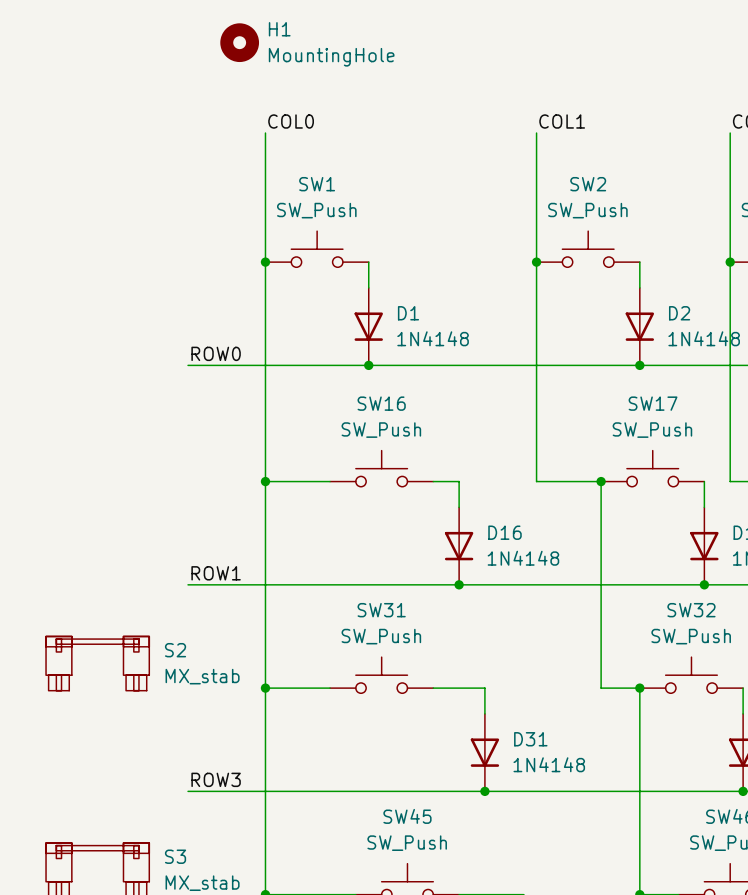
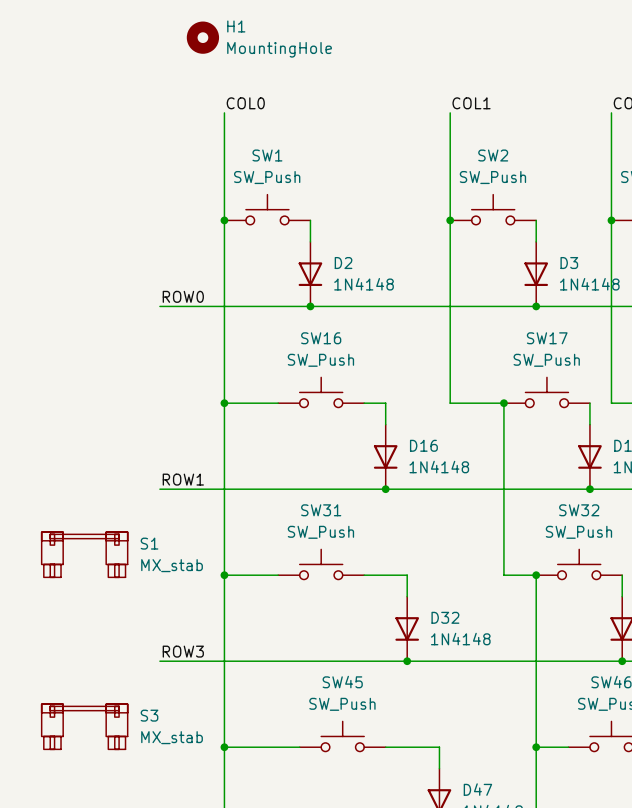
D1 name: D1 (408, 313) -> D2 (343, 263)
D2 name: D2 (679, 313) -> D3 (569, 263)
S2 name: S2 (175, 650) -> S1 (149, 543)
D31 name: D31 (530, 739) -> D32 (445, 617)

